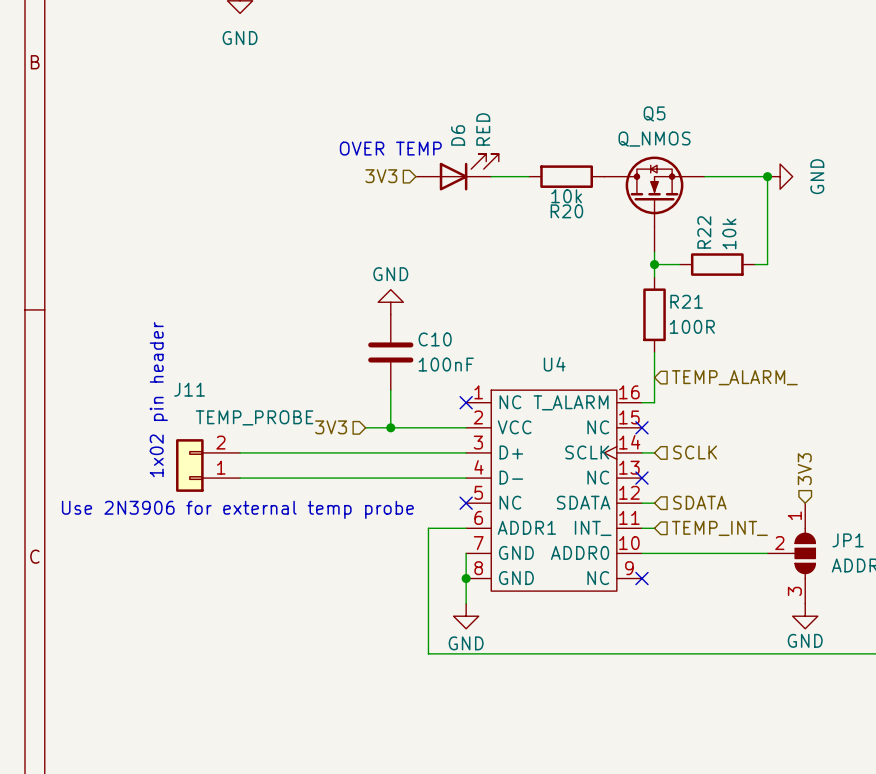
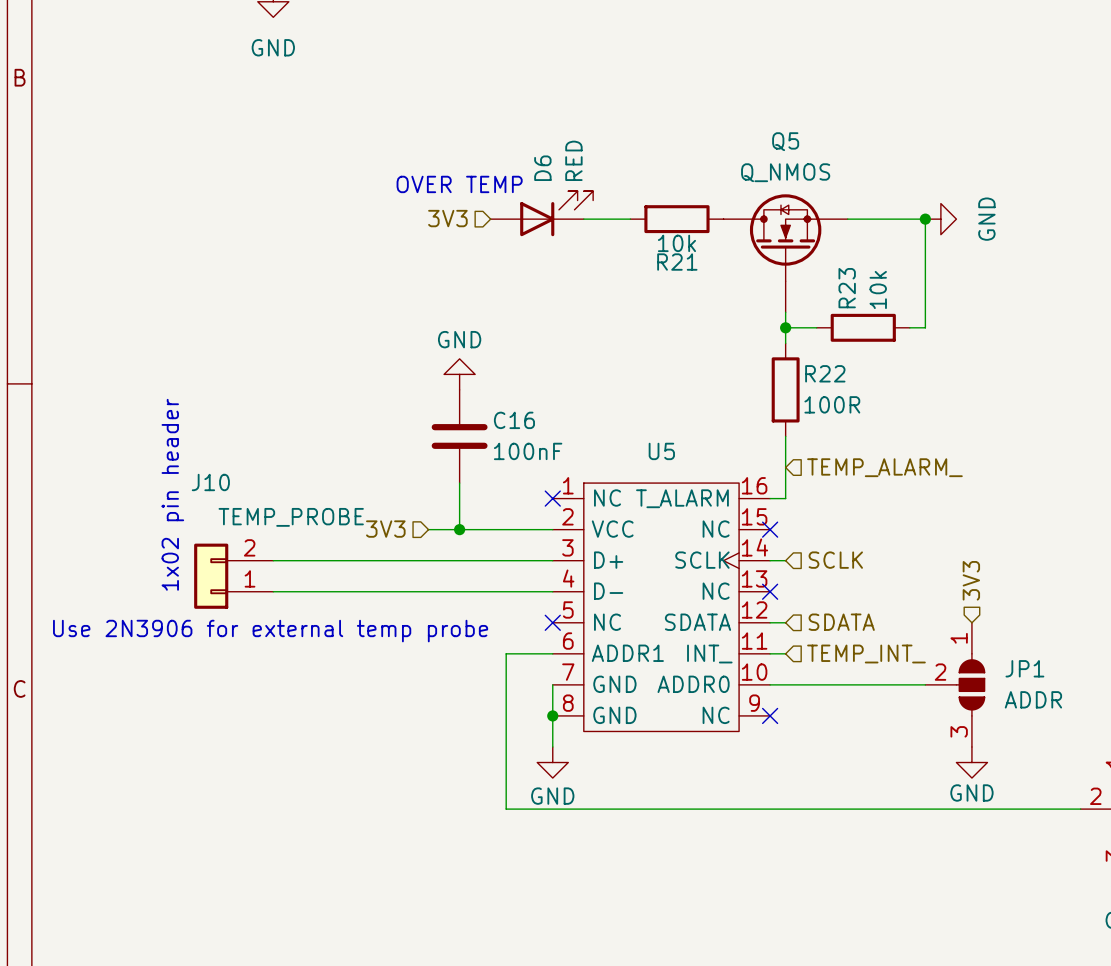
R20 name: R20 (566, 211) -> R21 (677, 262)
R22 name: R22 (704, 232) -> R23 (847, 288)
R21 name: R21 (686, 301) -> R22 (825, 373)
C10 name: C10 (435, 339) -> C16 (514, 420)
U4 name: U4 (554, 364) -> U5 (661, 451)
J11 name: J11 (189, 389) -> J10 (210, 482)

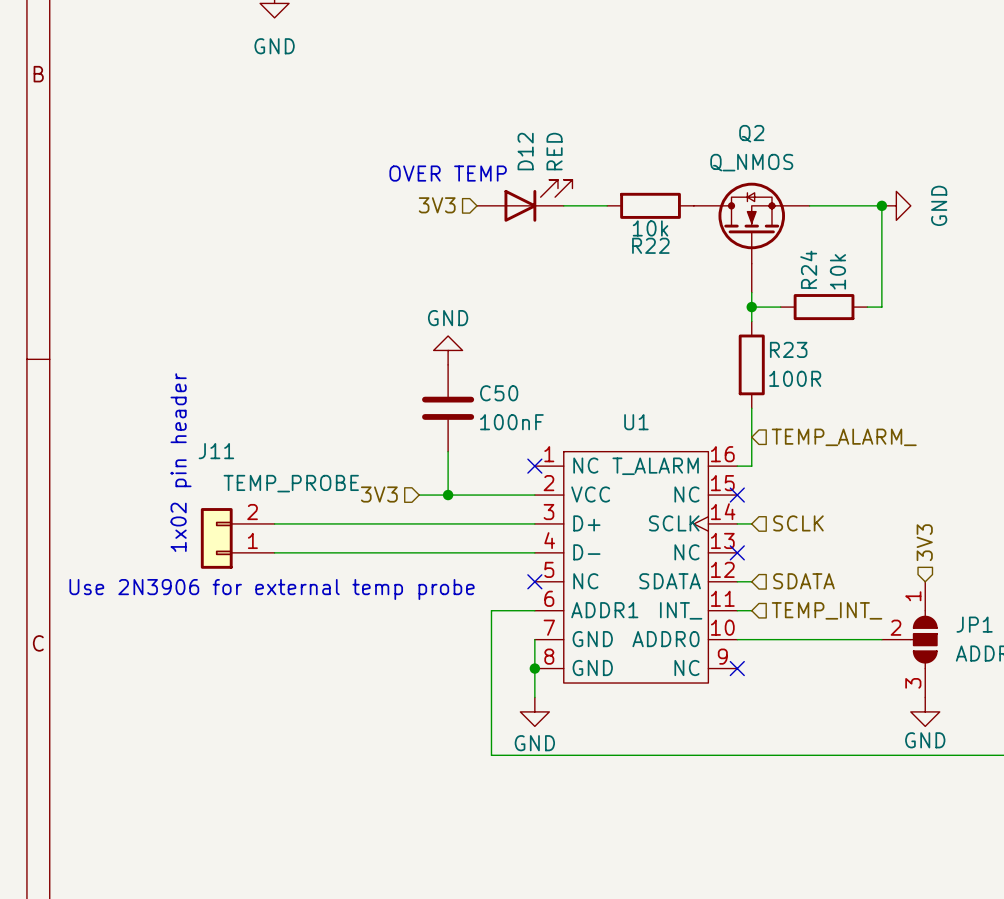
Q5 name: Q5 (785, 141) -> Q2 (751, 133)
D6 name: D6 (542, 168) -> D12 (525, 151)
R21 name: R21 (677, 262) -> R22 (650, 245)
R23 name: R23 (847, 288) -> R24 (808, 269)
R22 name: R22 (825, 373) -> R23 (788, 349)
C16 name: C16 (514, 420) -> C50 (499, 393)
U5 name: U5 (661, 451) -> U1 (636, 422)
J10 name: J10 (210, 482) -> J11 (216, 451)

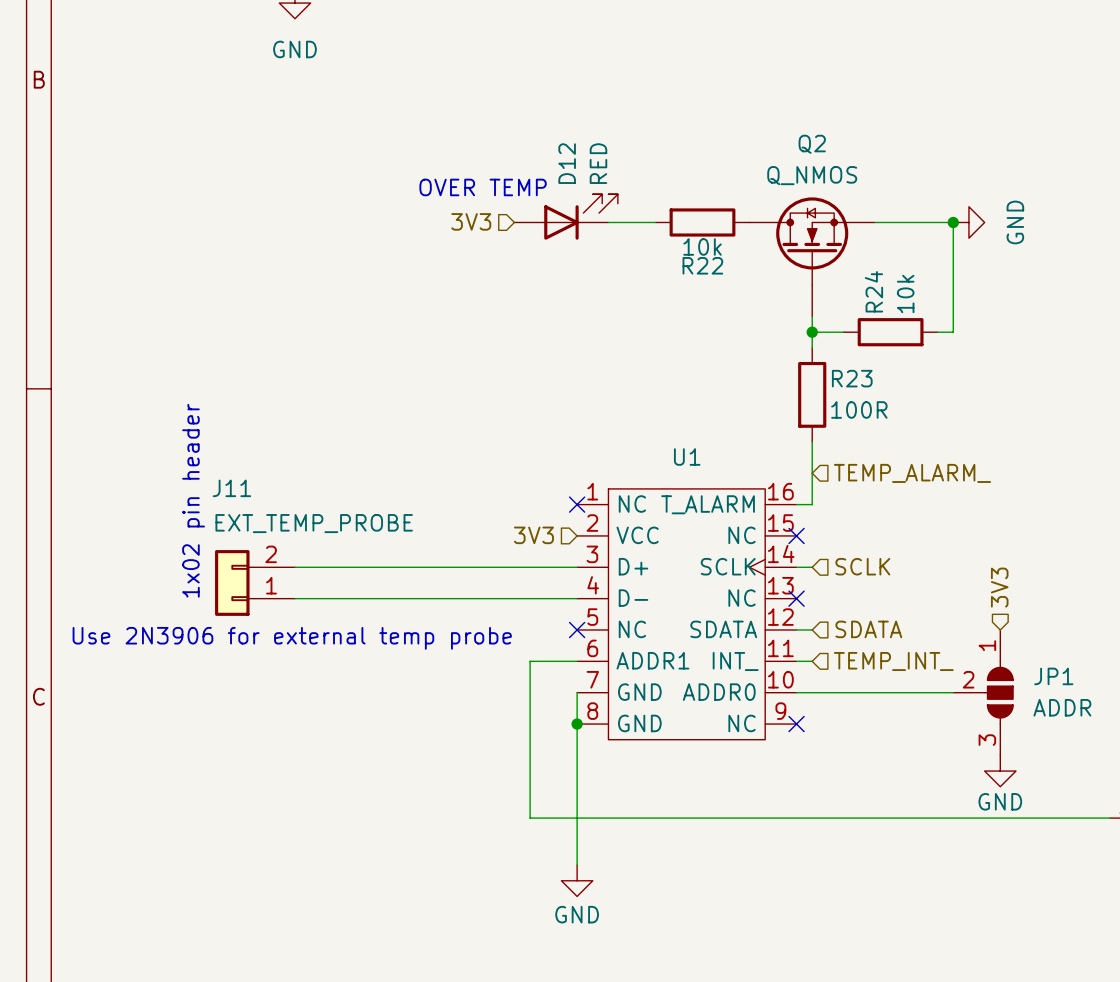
power symbol: GND (448, 350) -> none
C50: 100nF (448, 408) -> none
wire: (448, 451) (448, 495) -> none
J11 value: TEMP_PROBE (291, 483) -> EXT_TEMP_PROBE (314, 523)
hierarchical label position: 3V3 (379, 494) -> 3V3 (533, 535)
wire: (419, 495) (534, 495) -> none
junction: (448, 495) -> none
wire: none -> (577, 755) (577, 865)
power symbol position: GND (534, 711) -> GND (577, 880)

